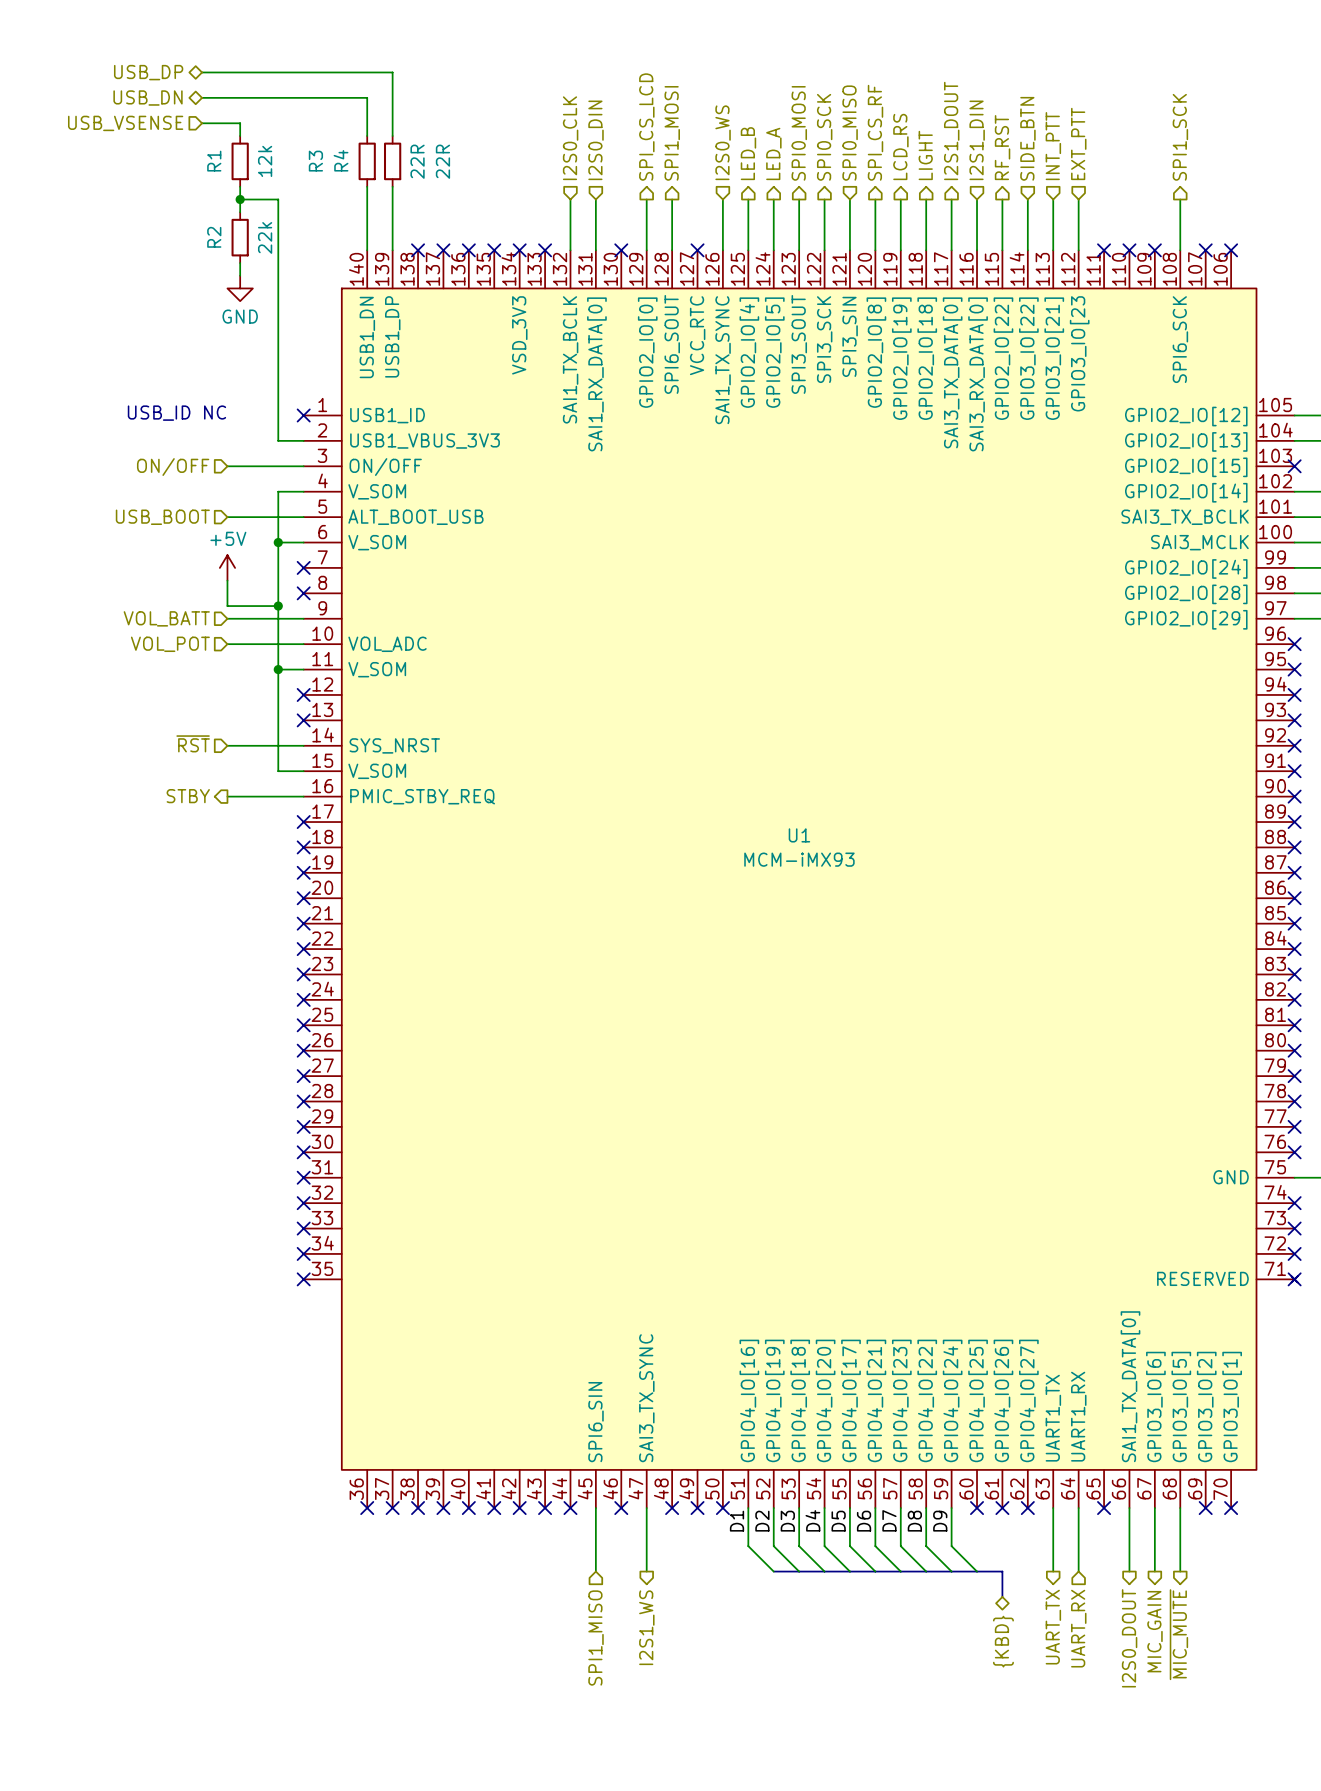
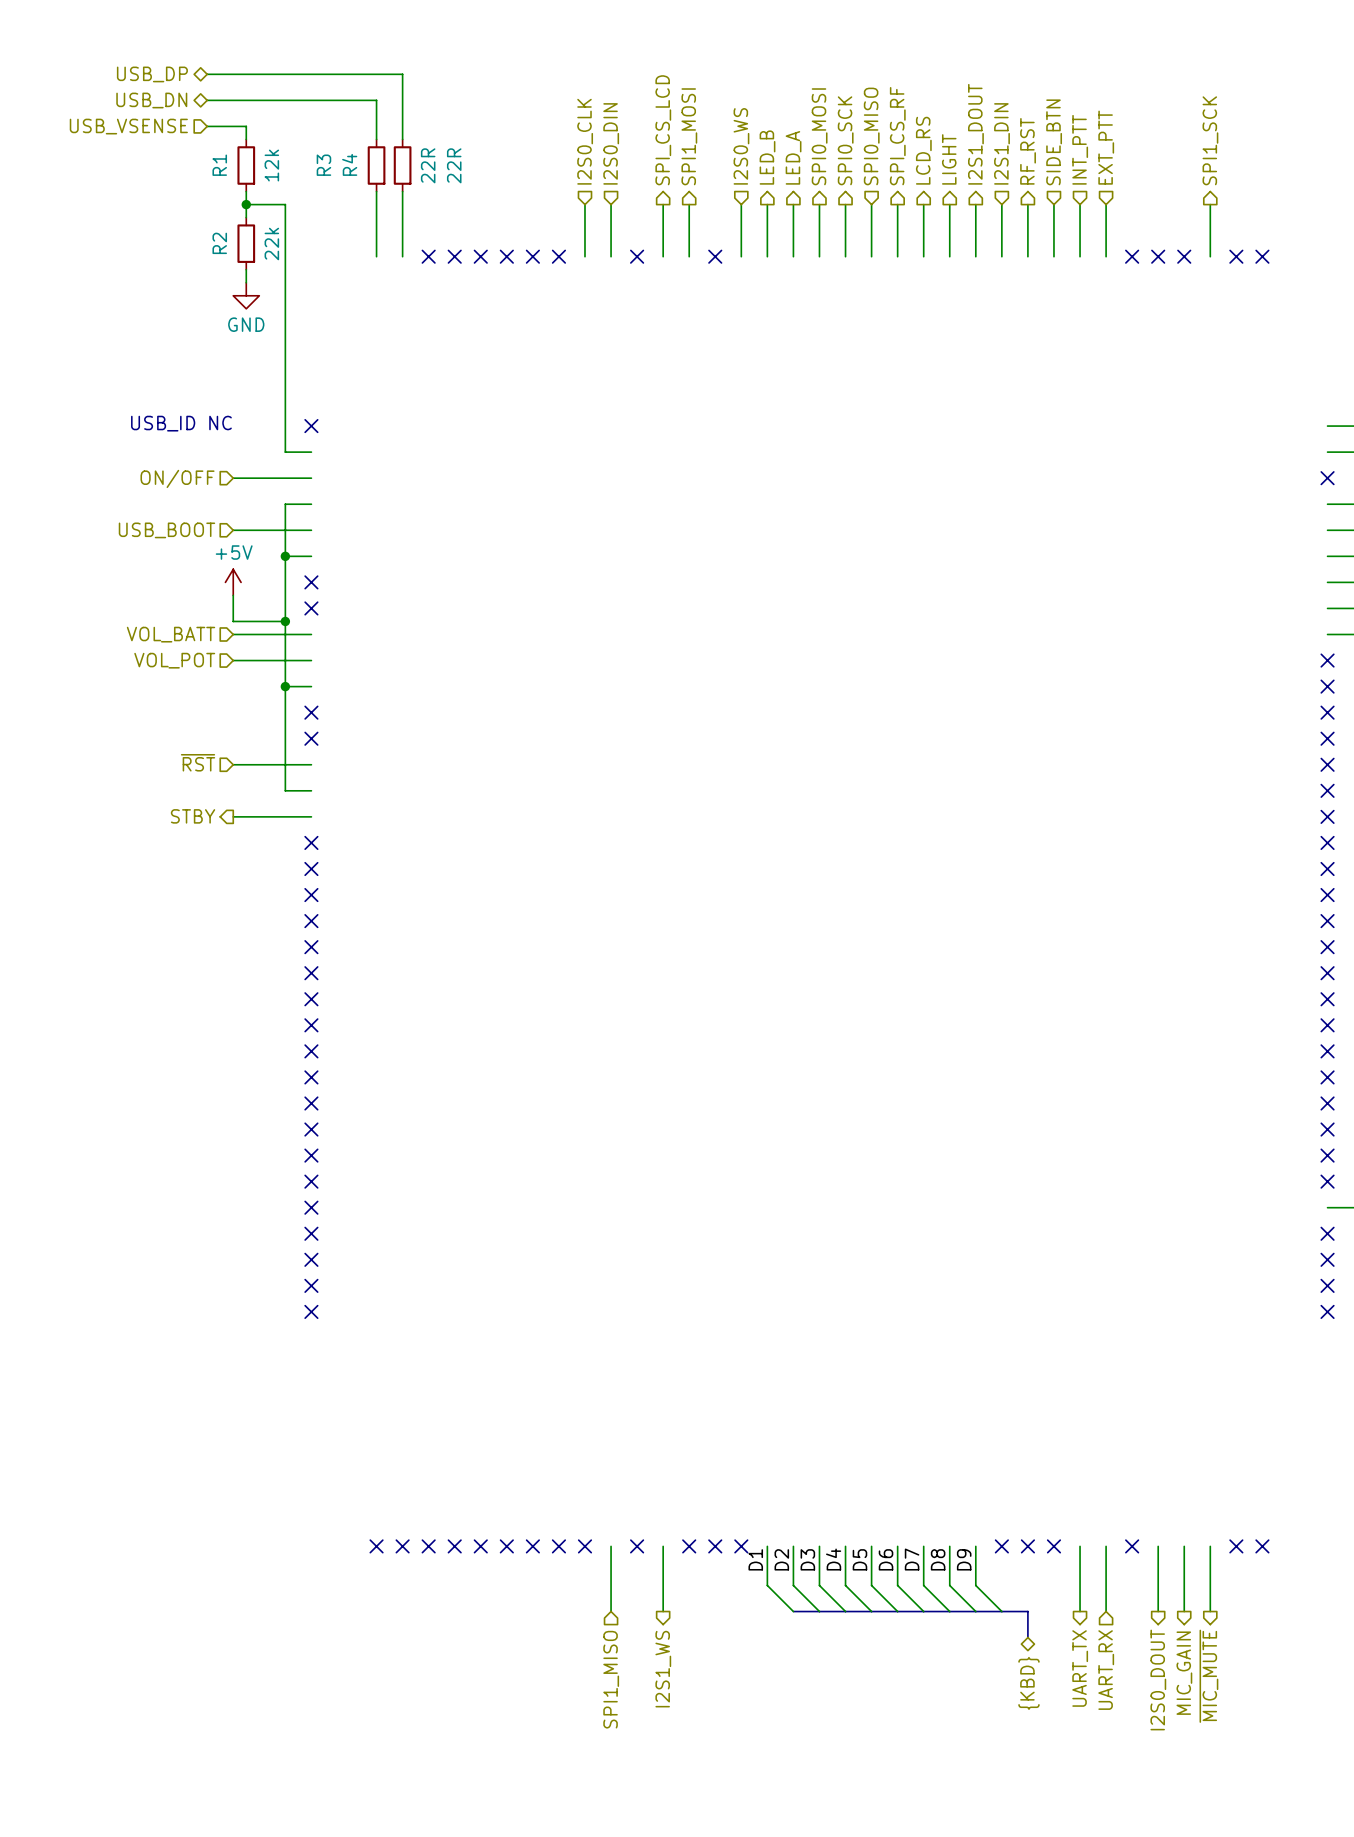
U1: MCM-iMX93 (800, 879) -> none

